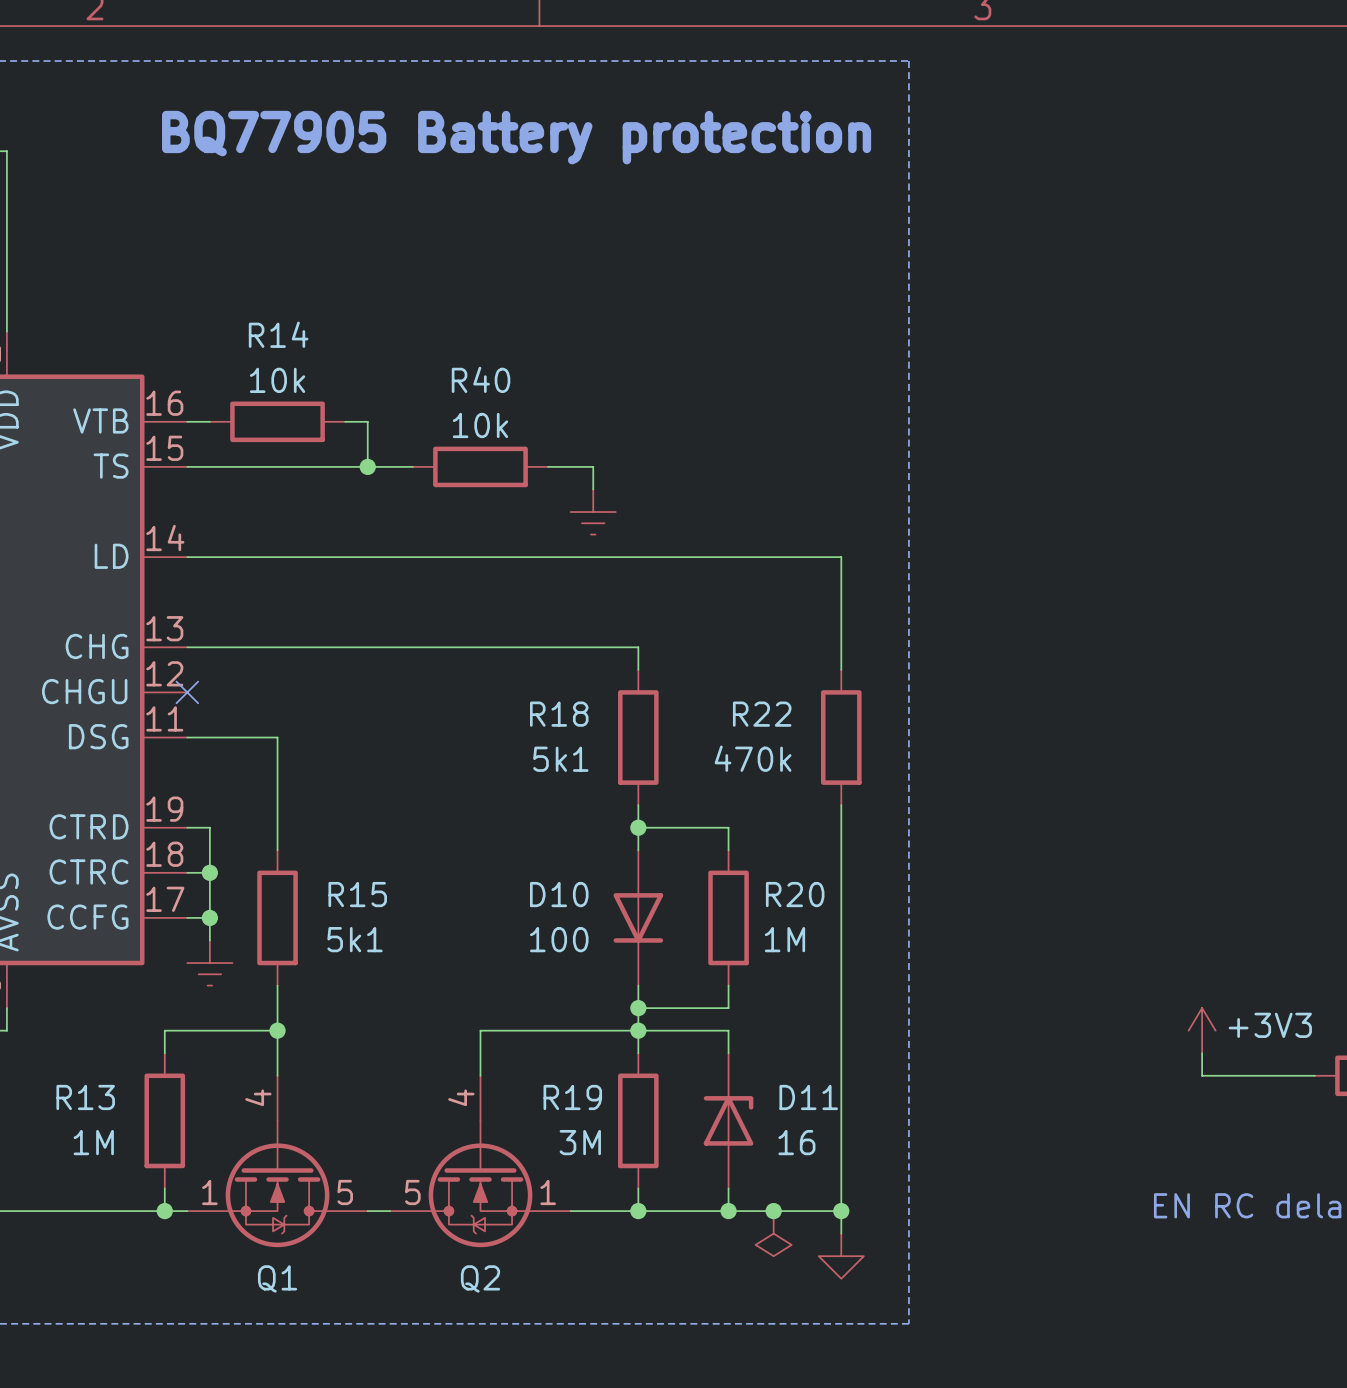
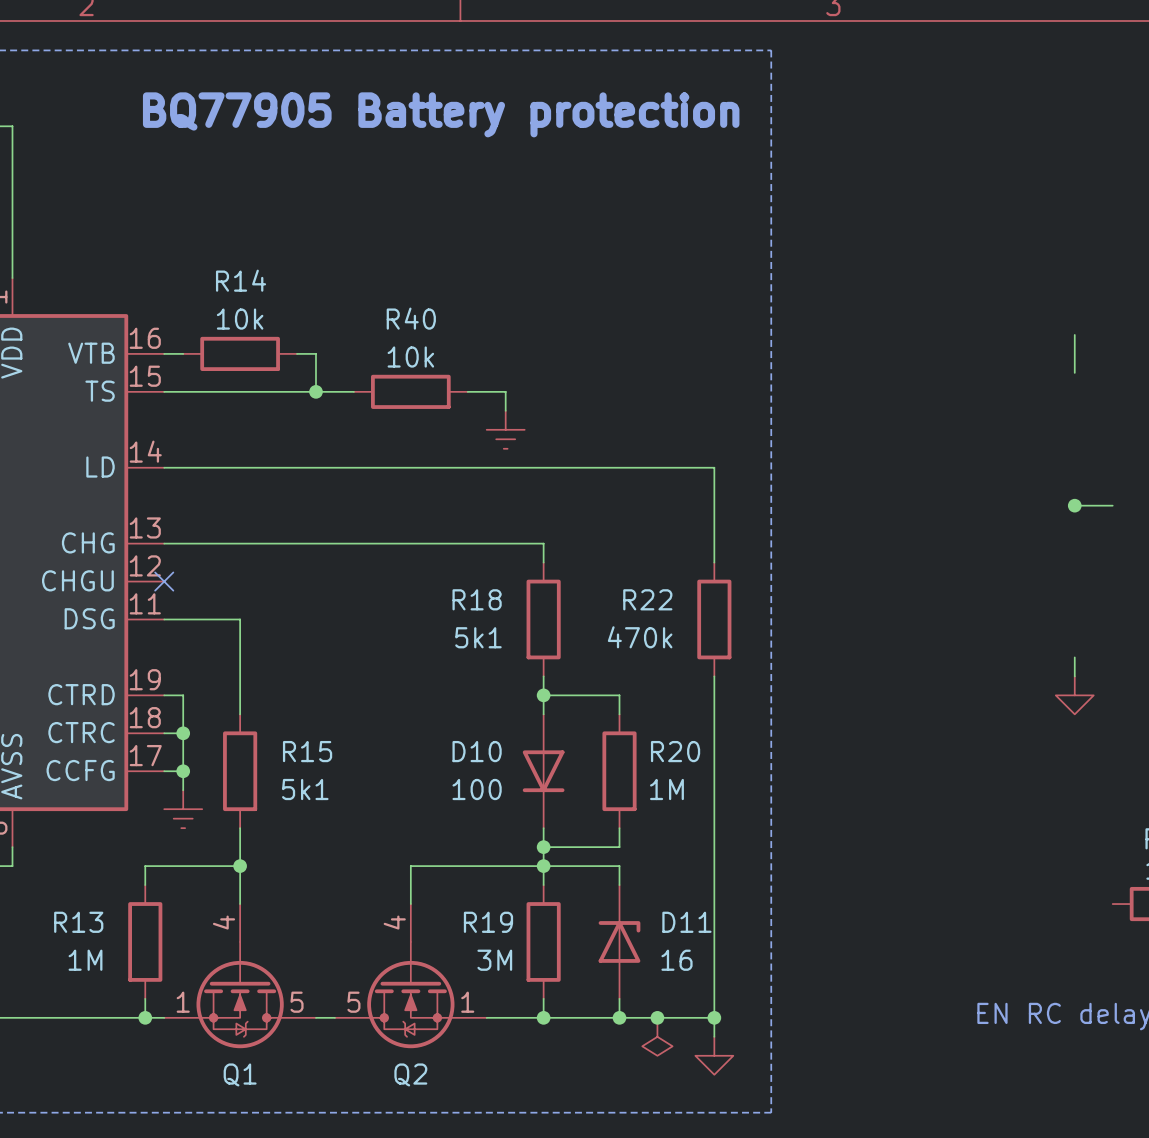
wire: none -> (1074, 334) (1074, 372)
wire: none -> (1074, 505) (1112, 505)
junction: none -> (1074, 505)
wire: none -> (1074, 657) (1074, 676)
power symbol: none -> (1074, 695)
power symbol: +3V3 (1202, 1030) -> none
wire: (1202, 1053) (1202, 1075) (1314, 1075) -> none

